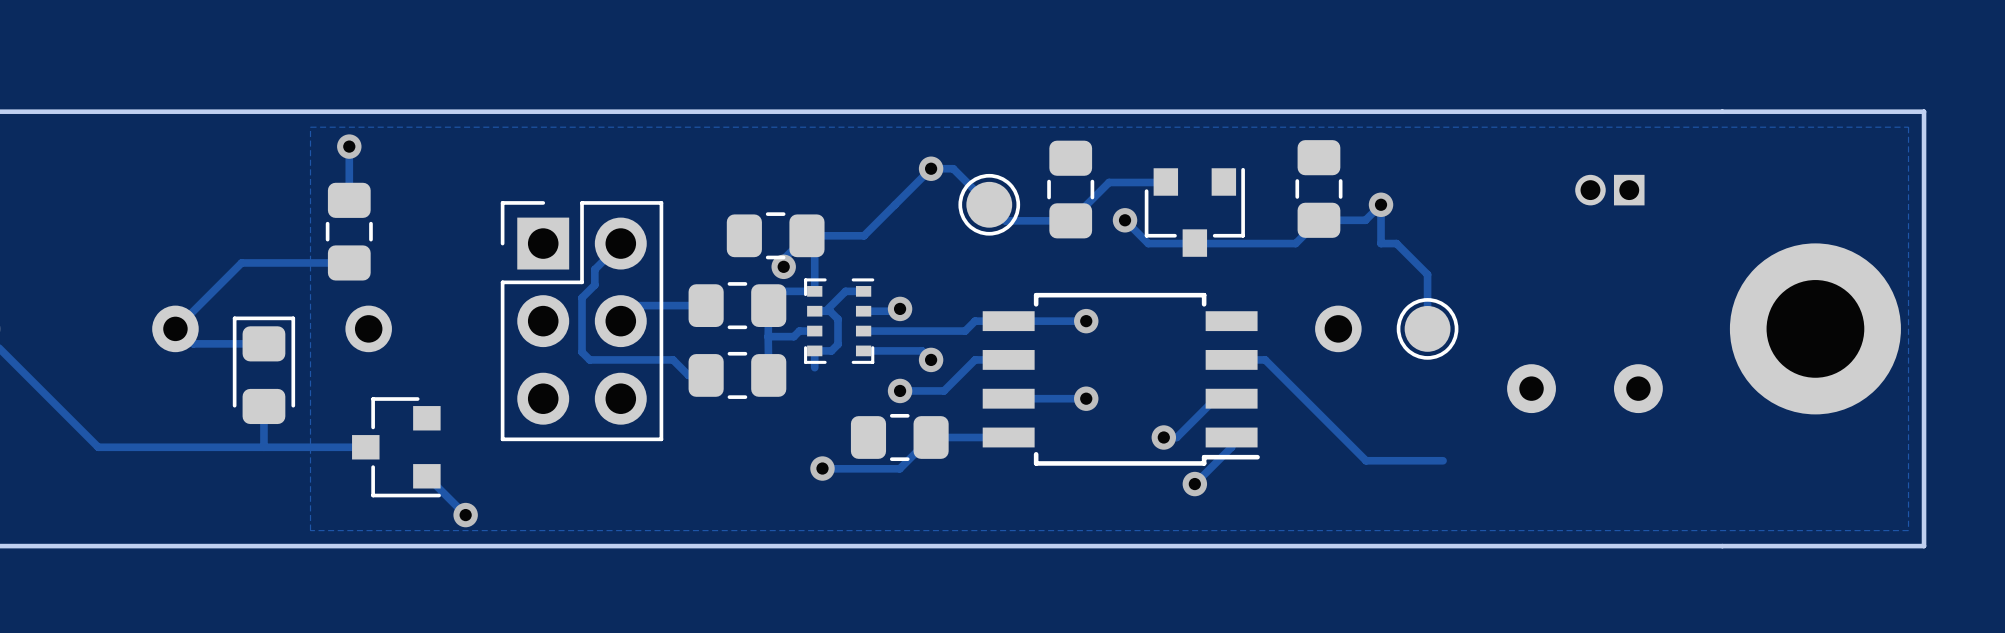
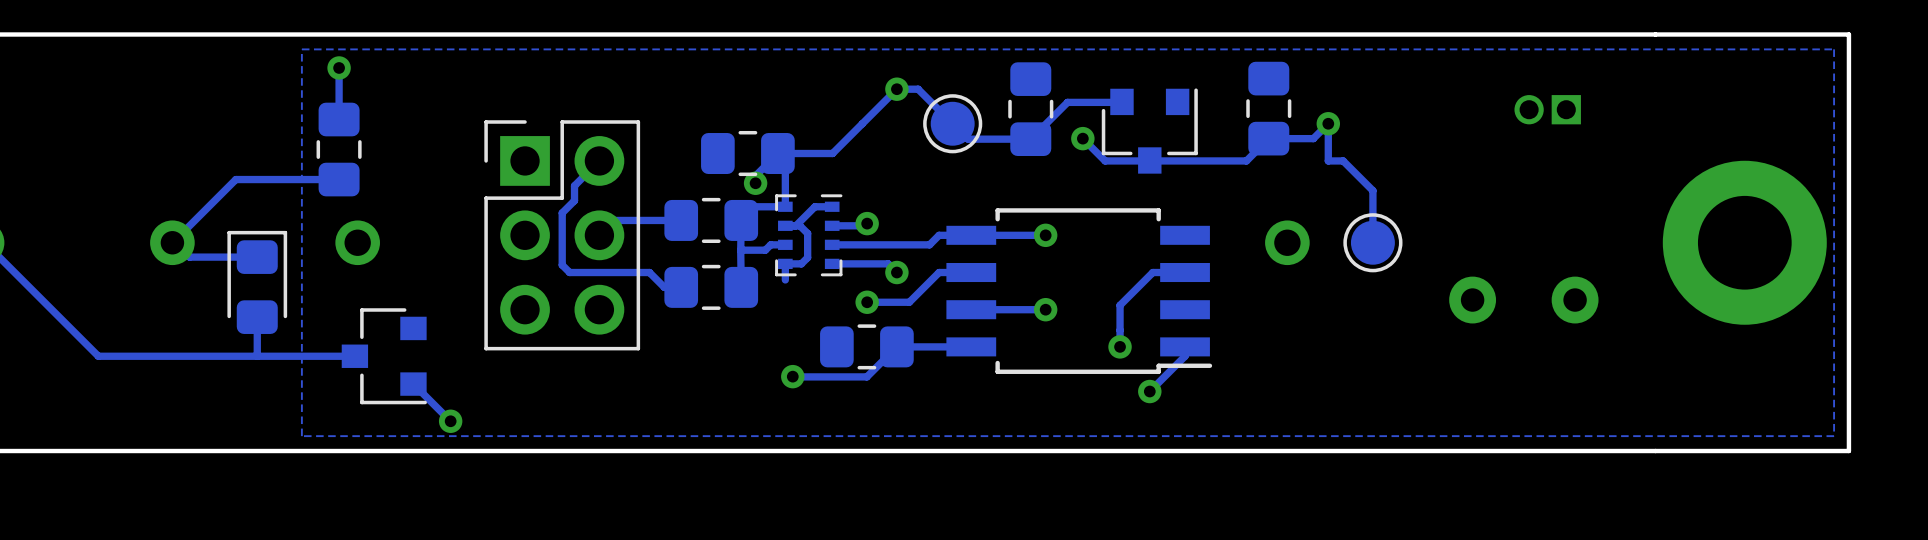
track: (1231, 359) (1265, 359) (1366, 460) (1443, 460) -> none
track: (1231, 398) (1215, 398) (1176, 437) (1163, 437) -> (1185, 272) (1152, 272) (1120, 305) (1120, 346)

